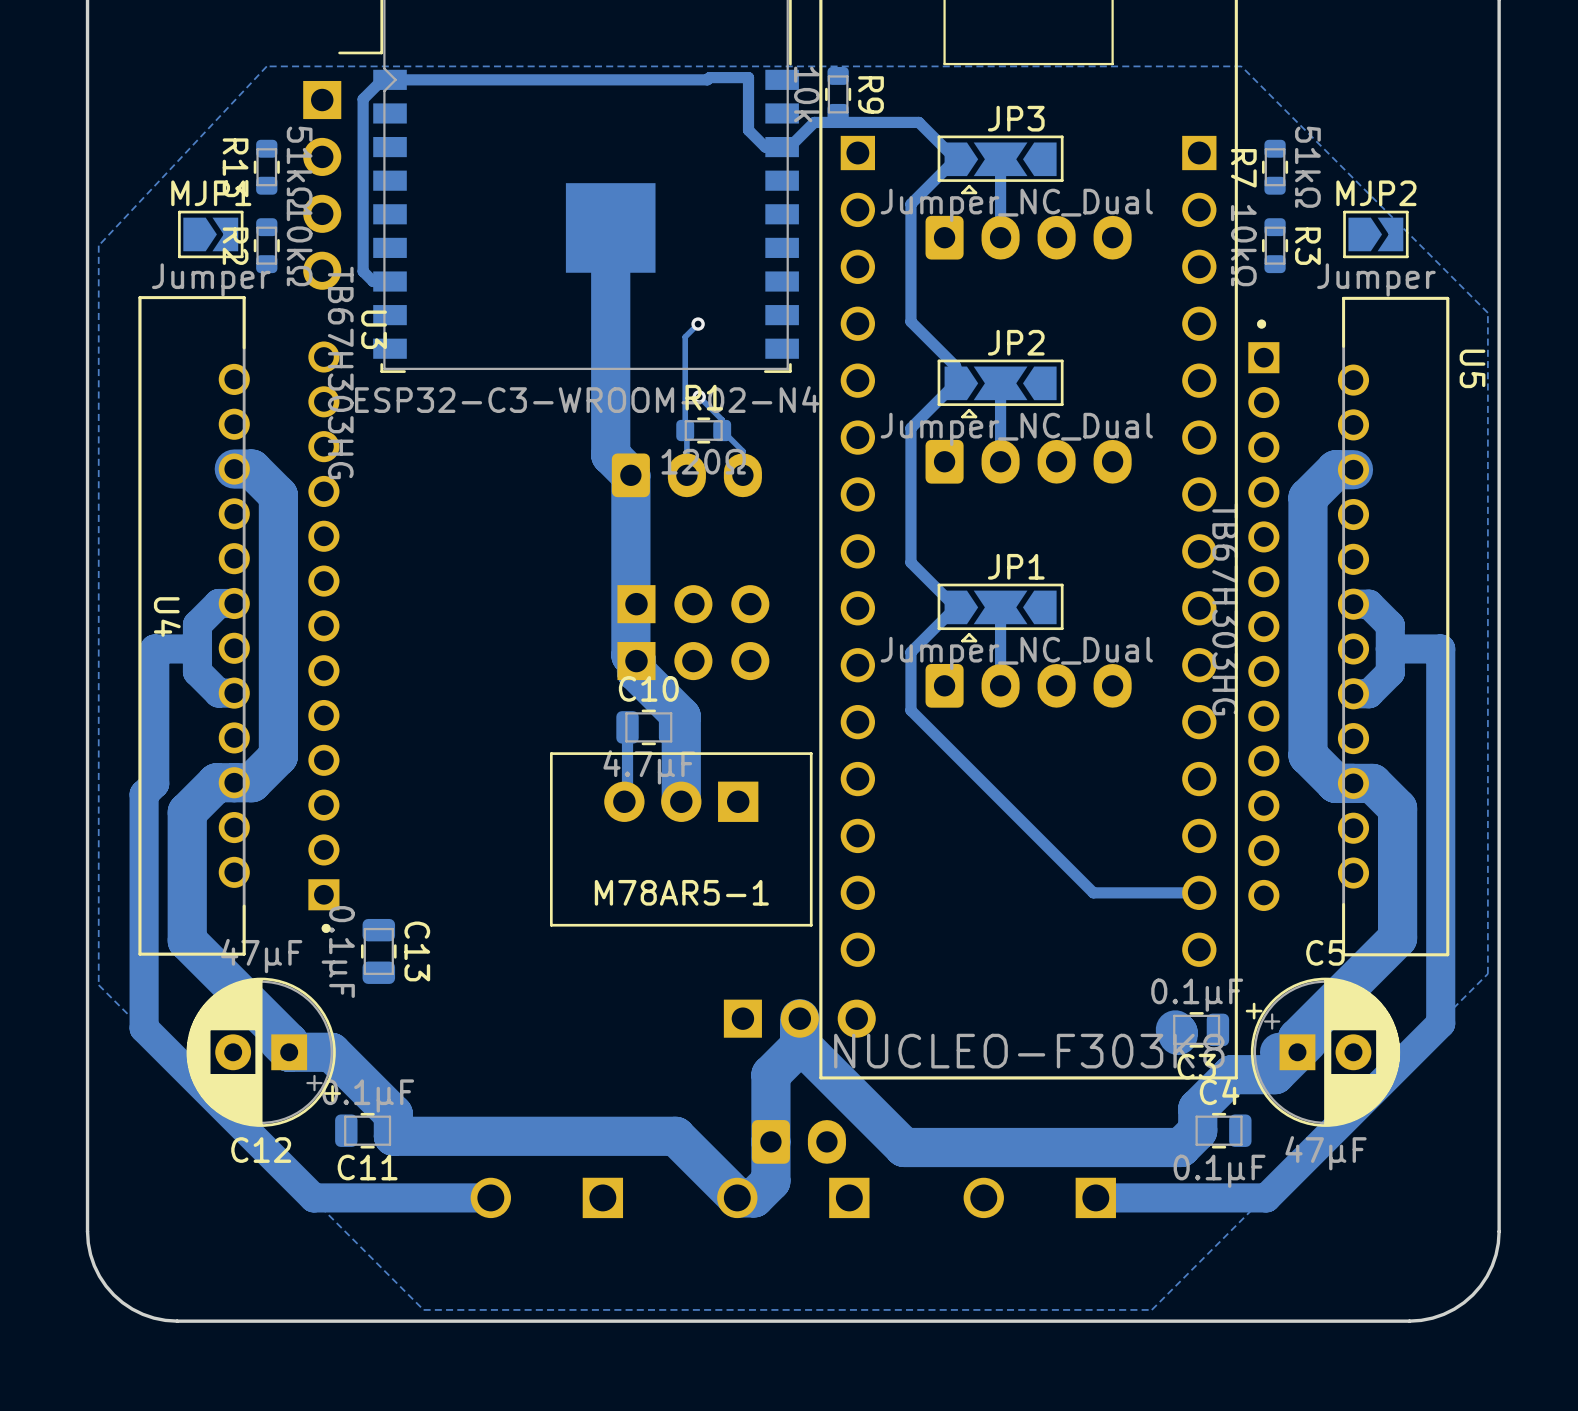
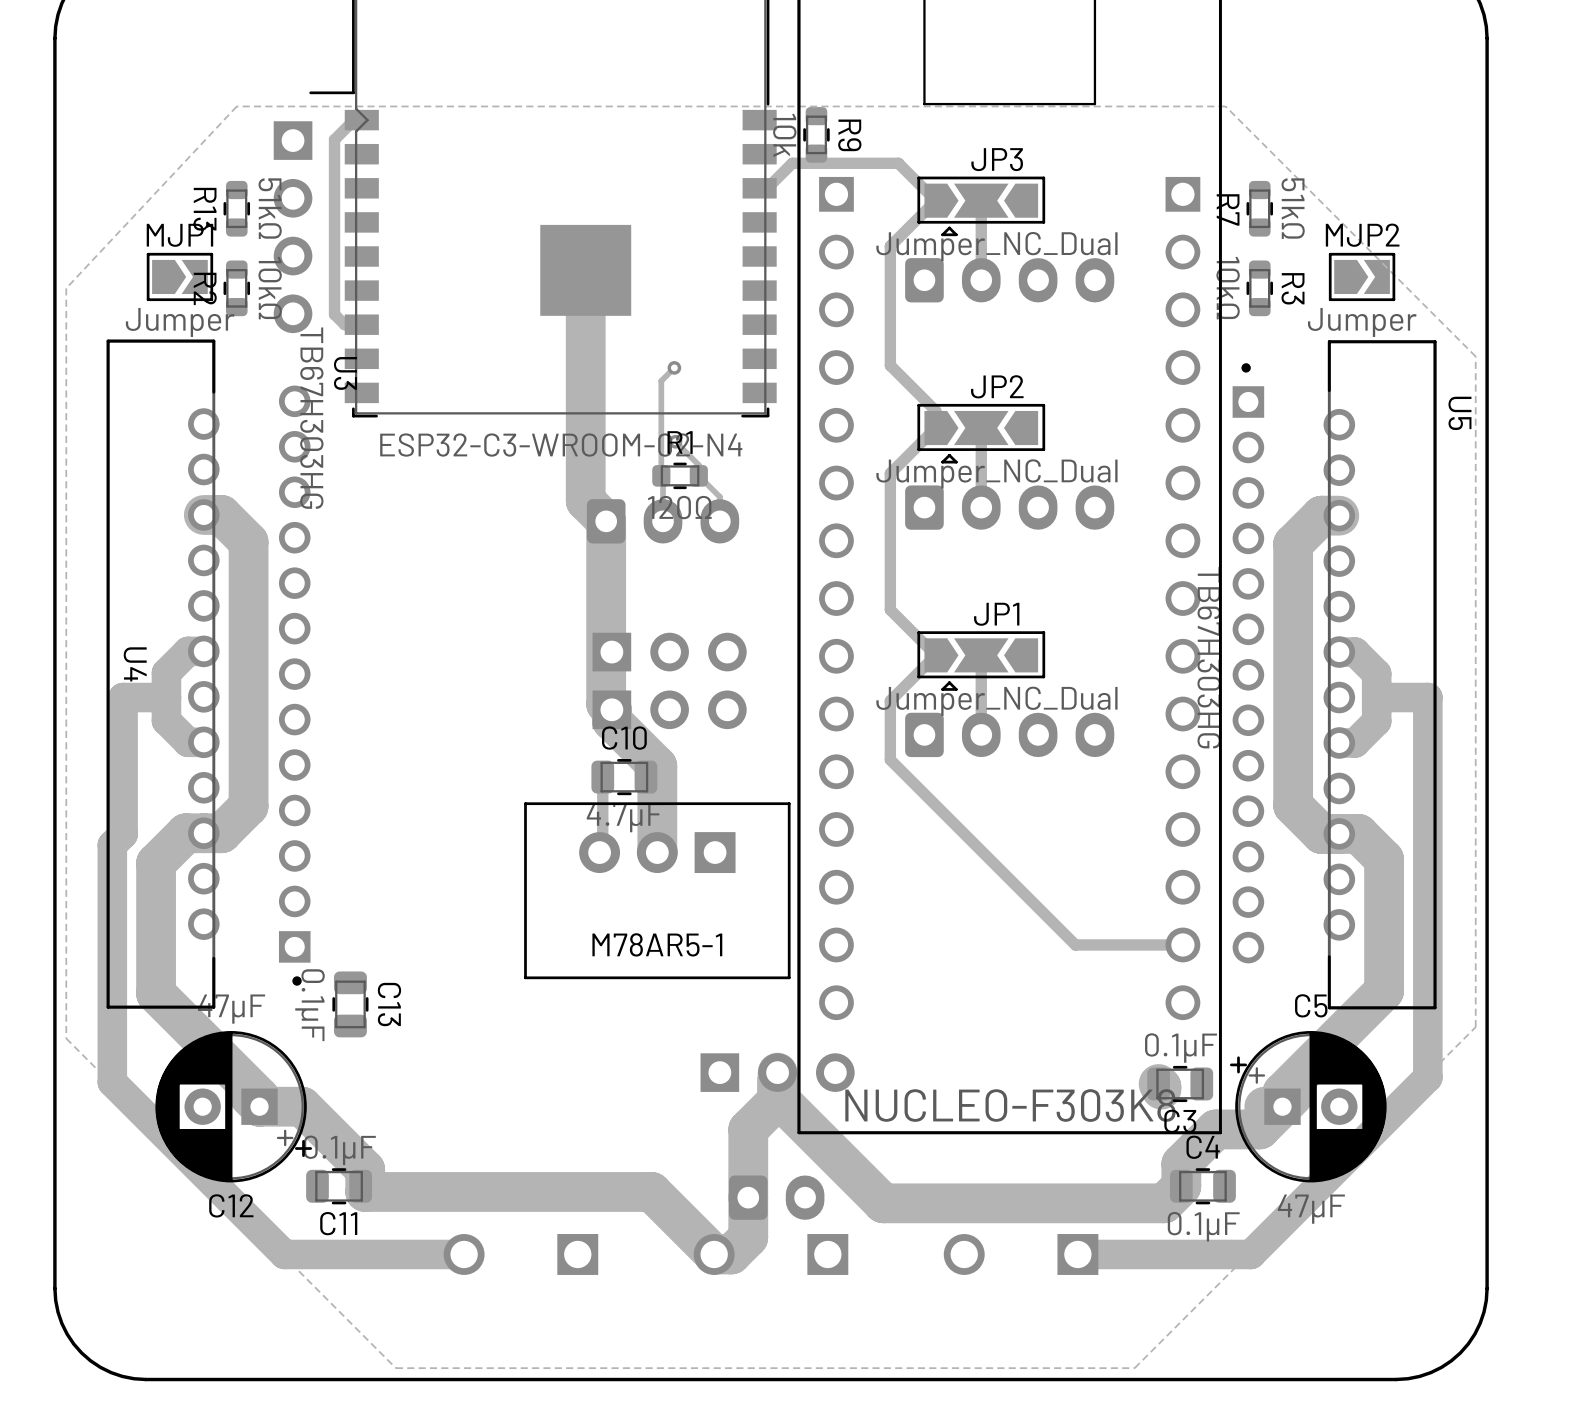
track: (390, 79) (707, 79) (709, 77) (748, 77) (748, 130) (765, 147) (782, 147) -> none

